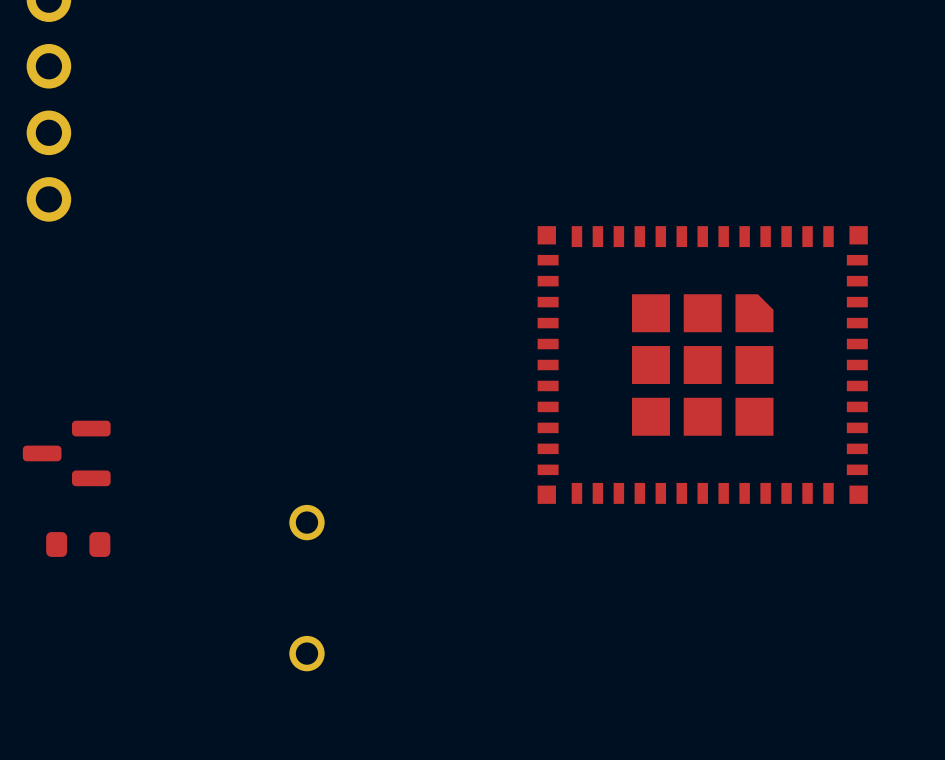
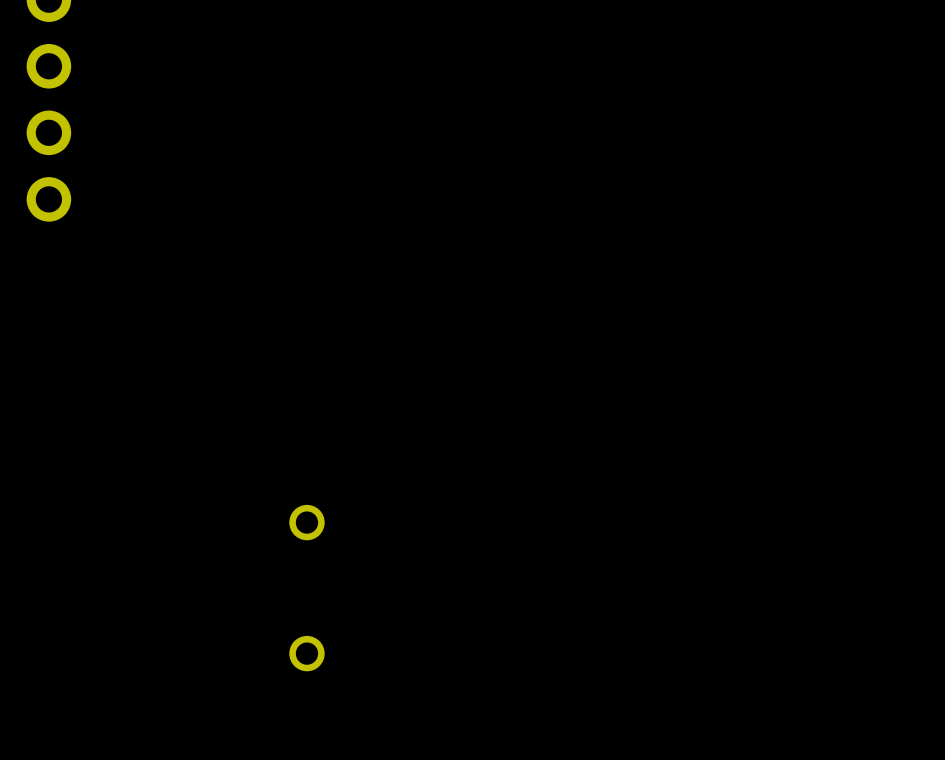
part: (702, 365) -> none
part: (66, 453) -> none
part: (78, 544) -> none

